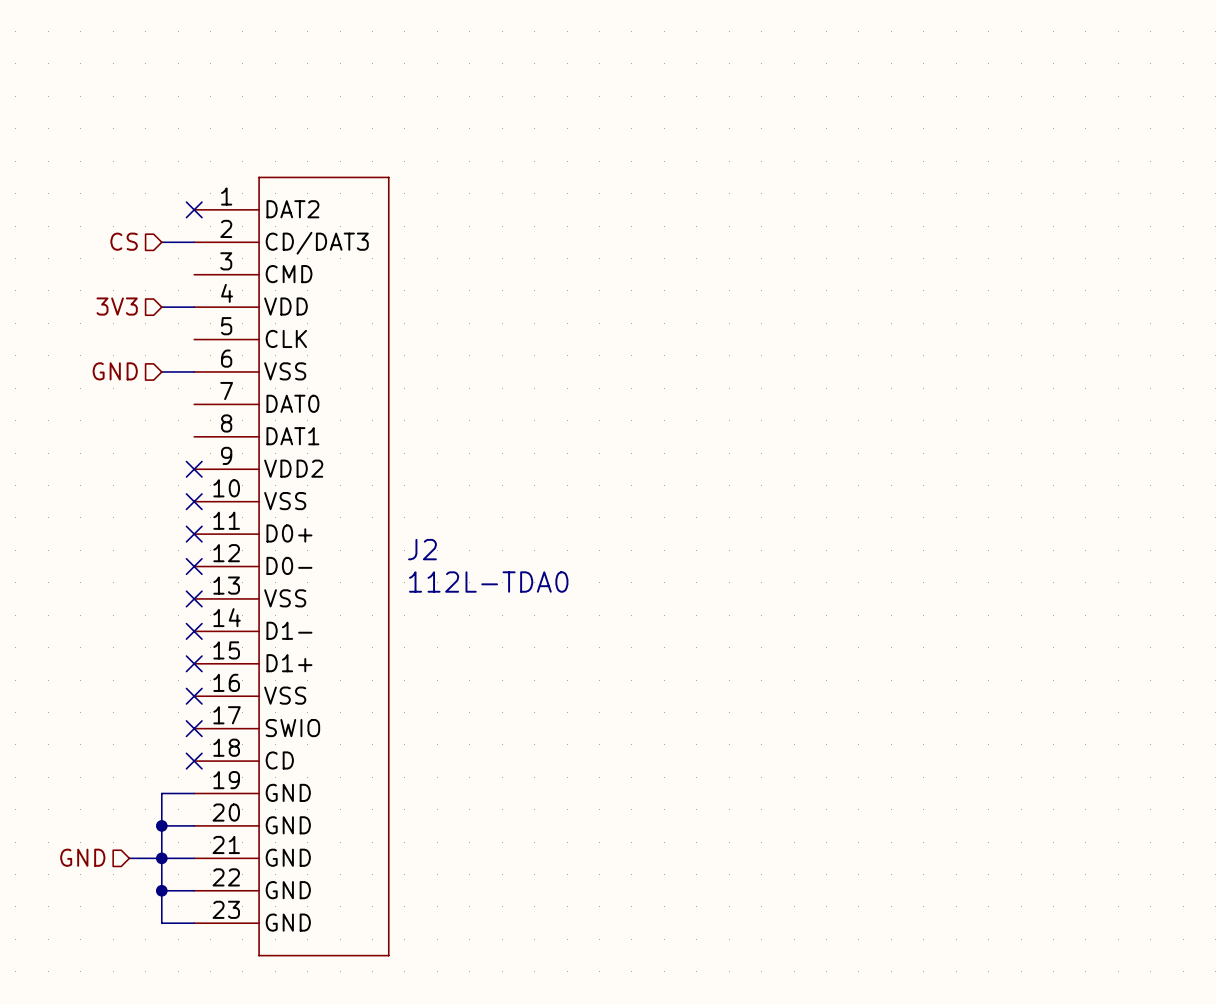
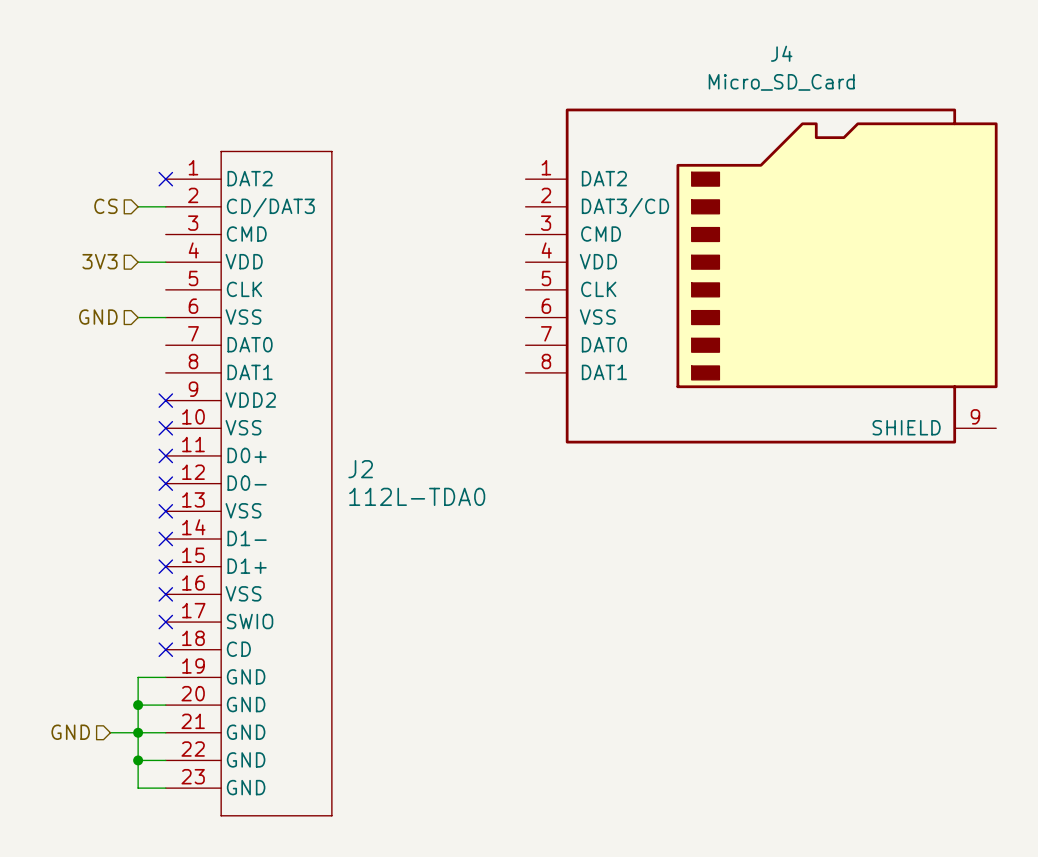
J4: none -> Micro_SD_Card (761, 276)

